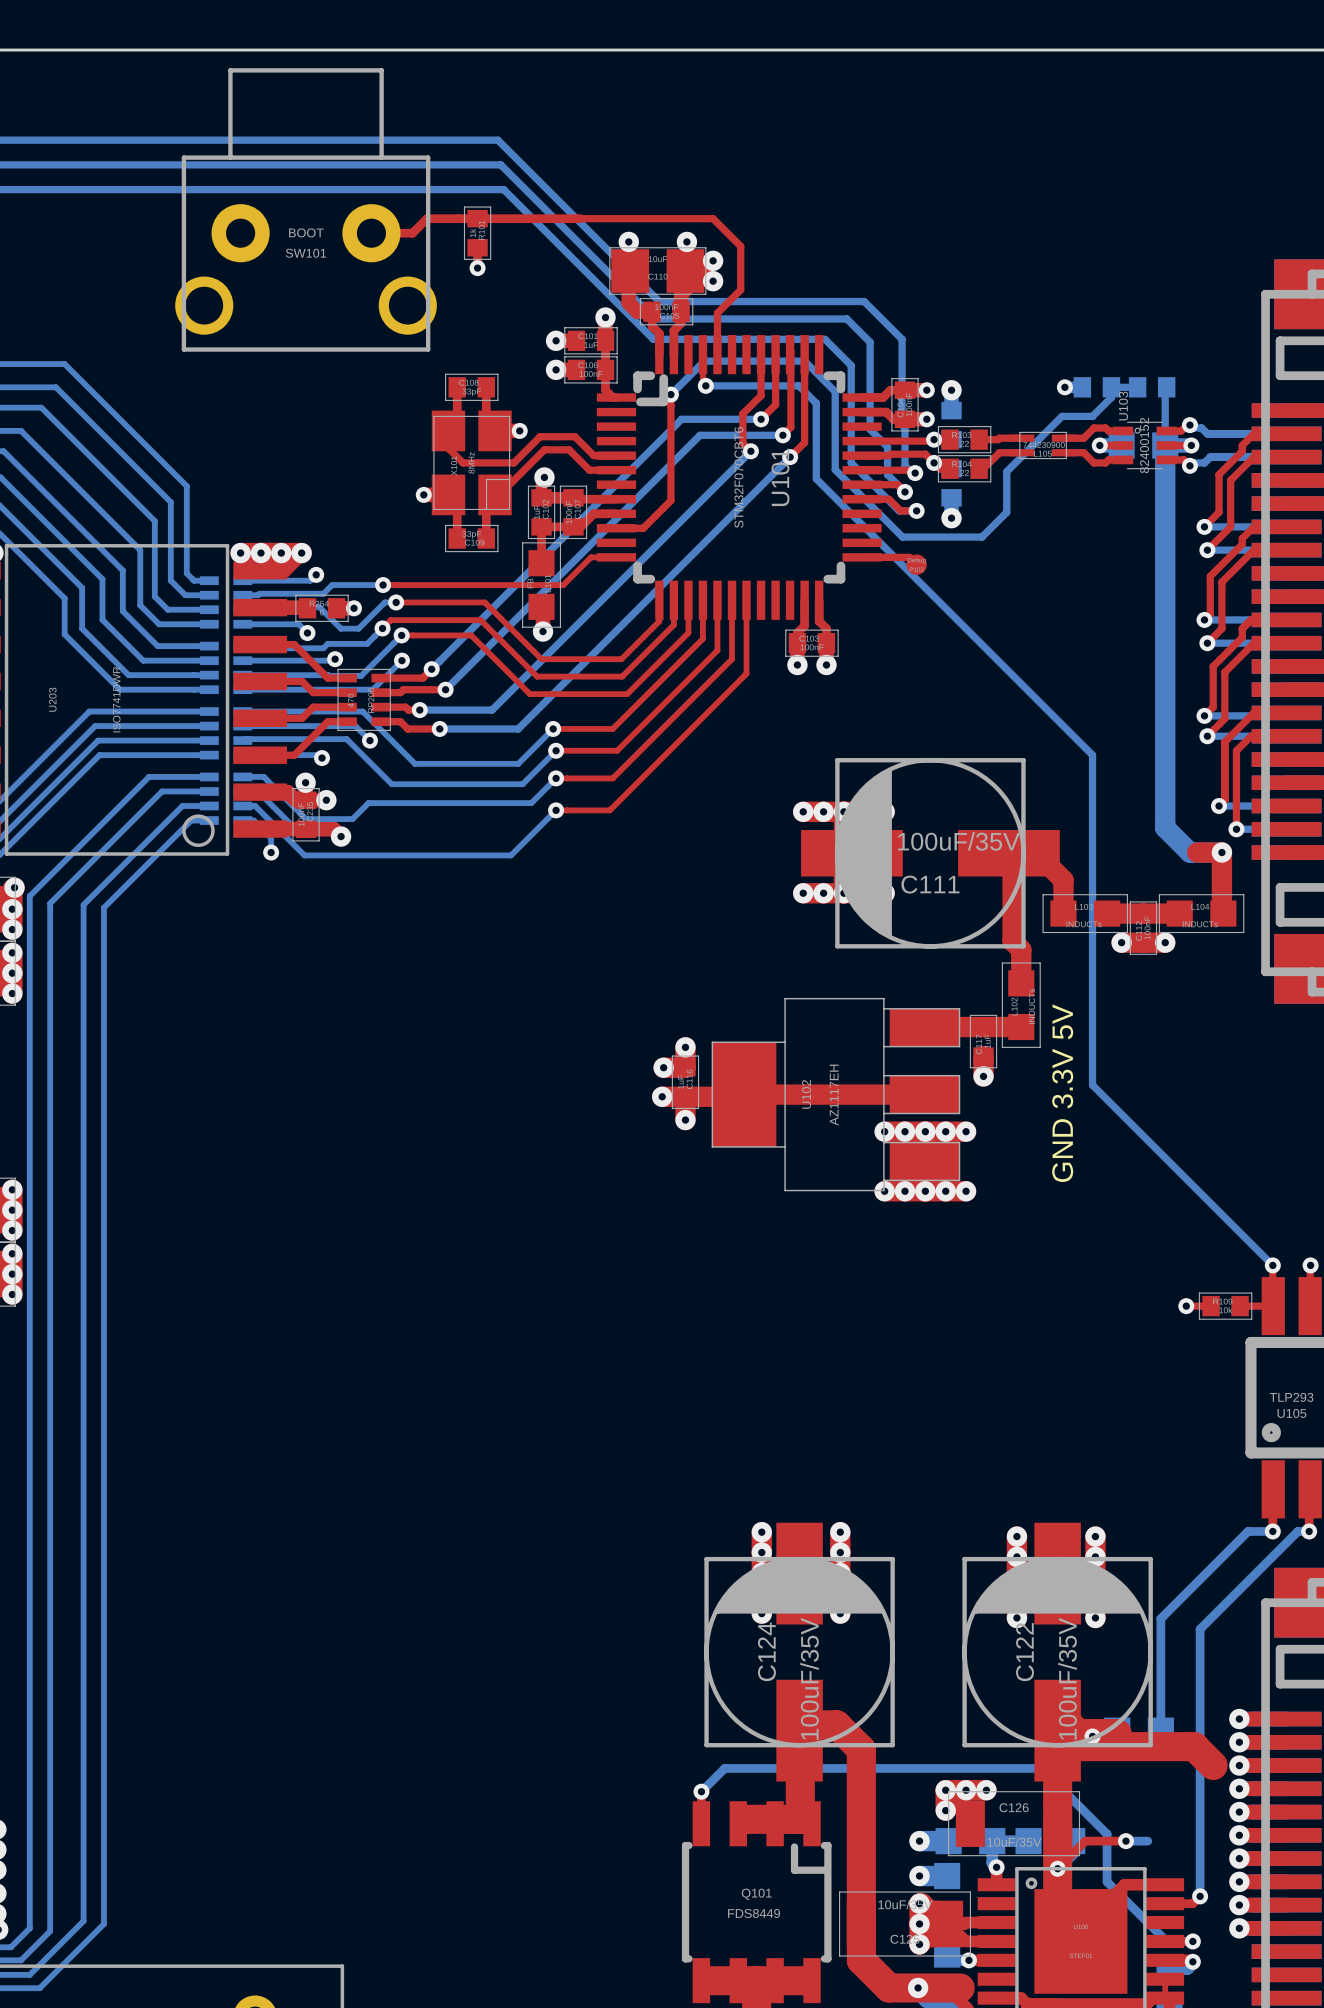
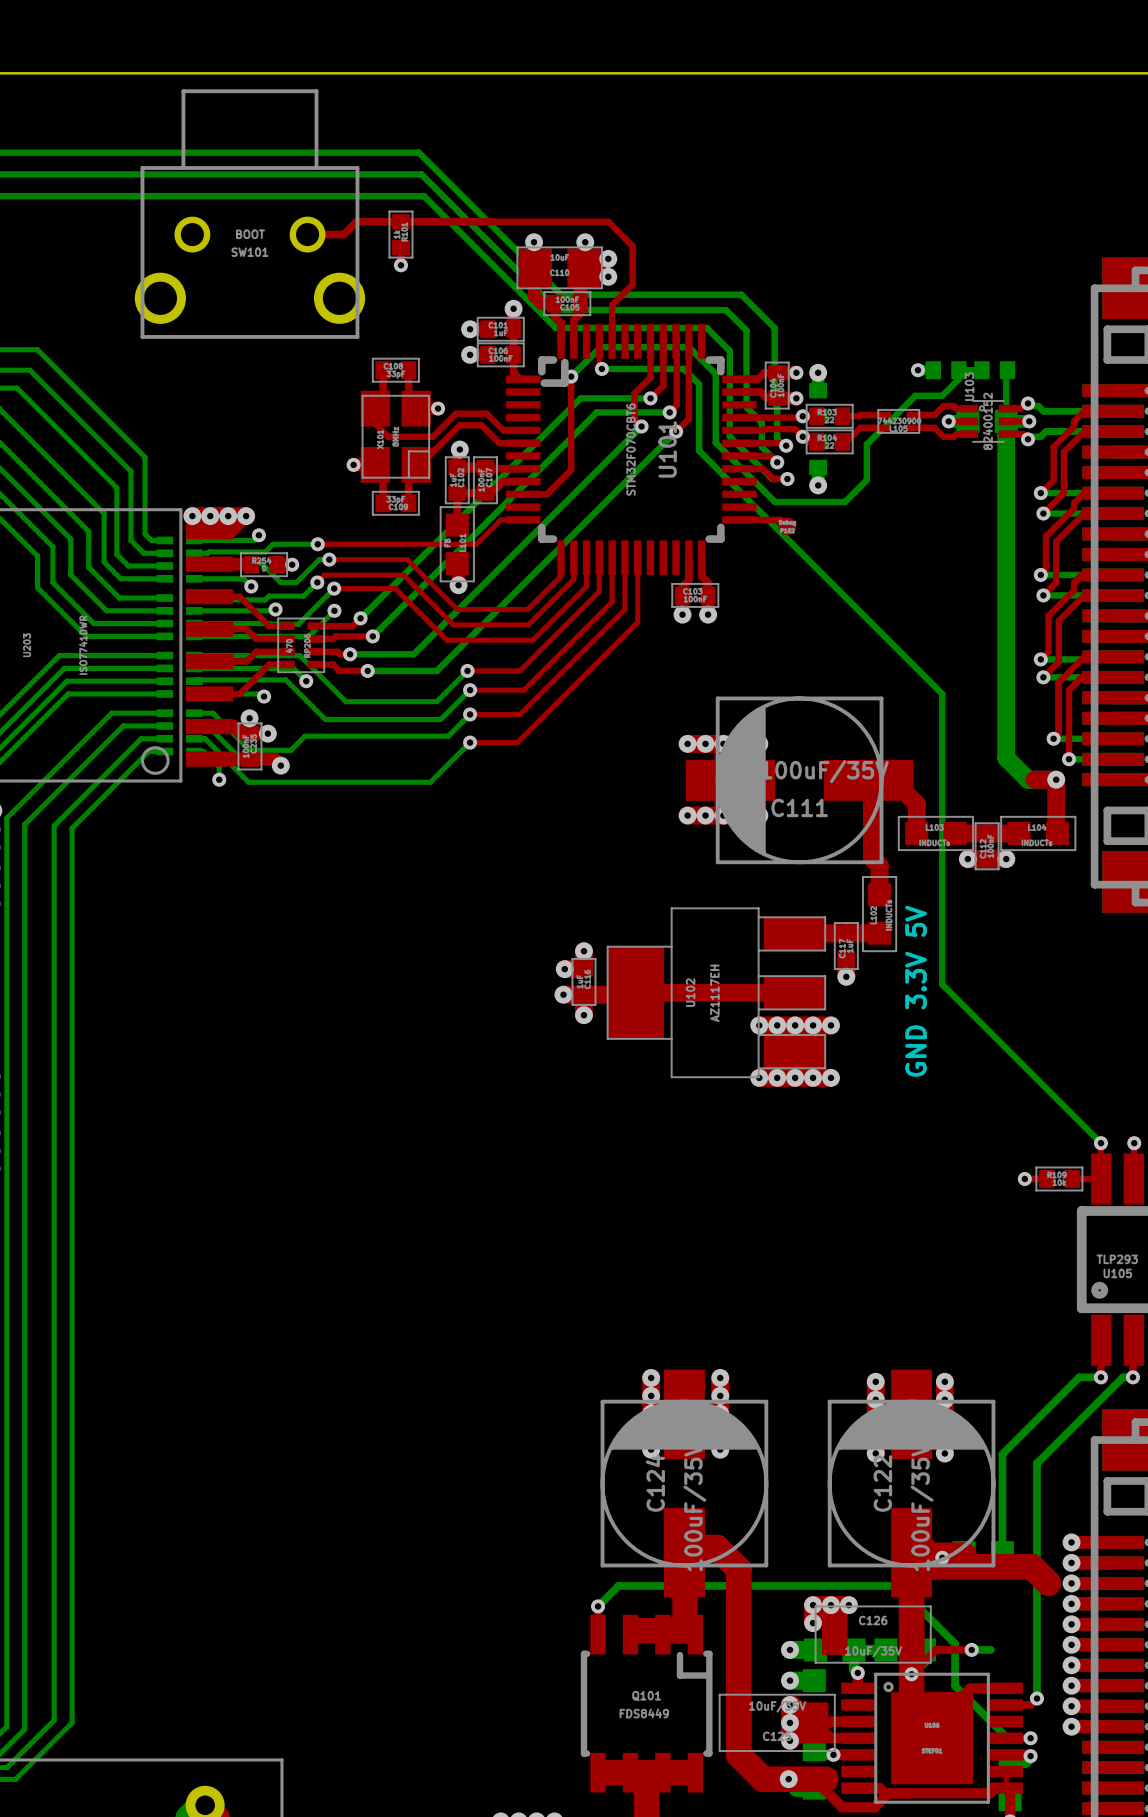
SW101 footprint: [175, 68, 437, 352] -> [134, 89, 366, 339]

